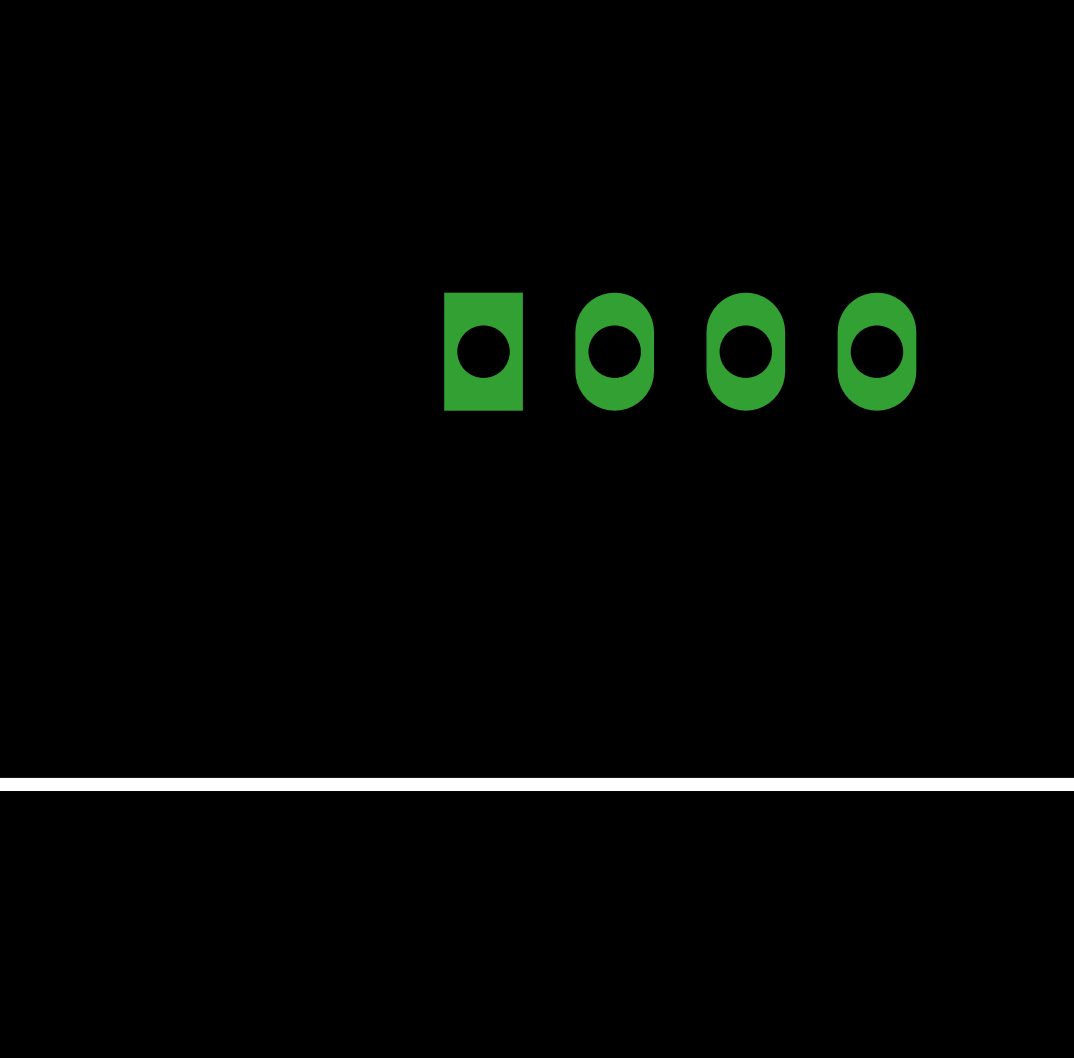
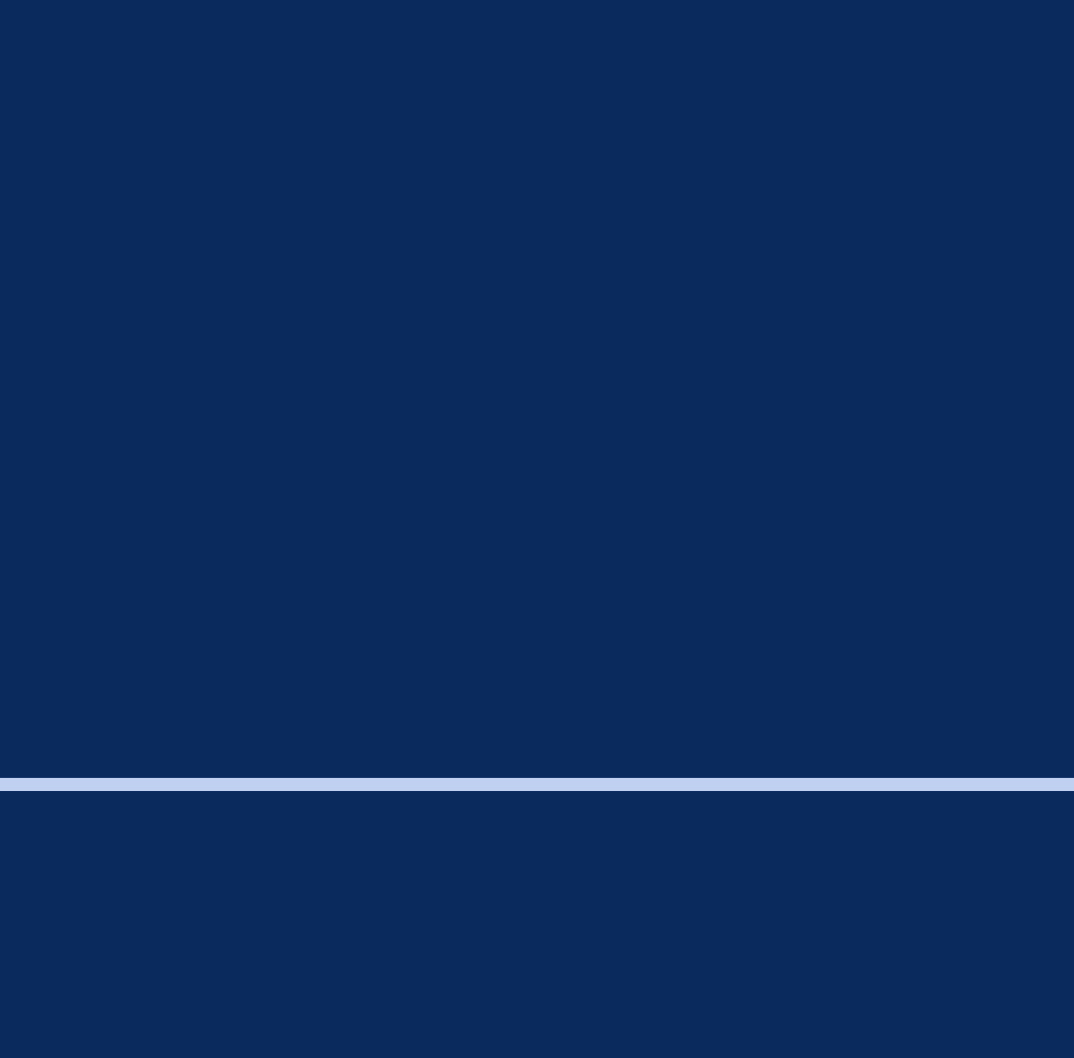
part: (680, 351) -> none

